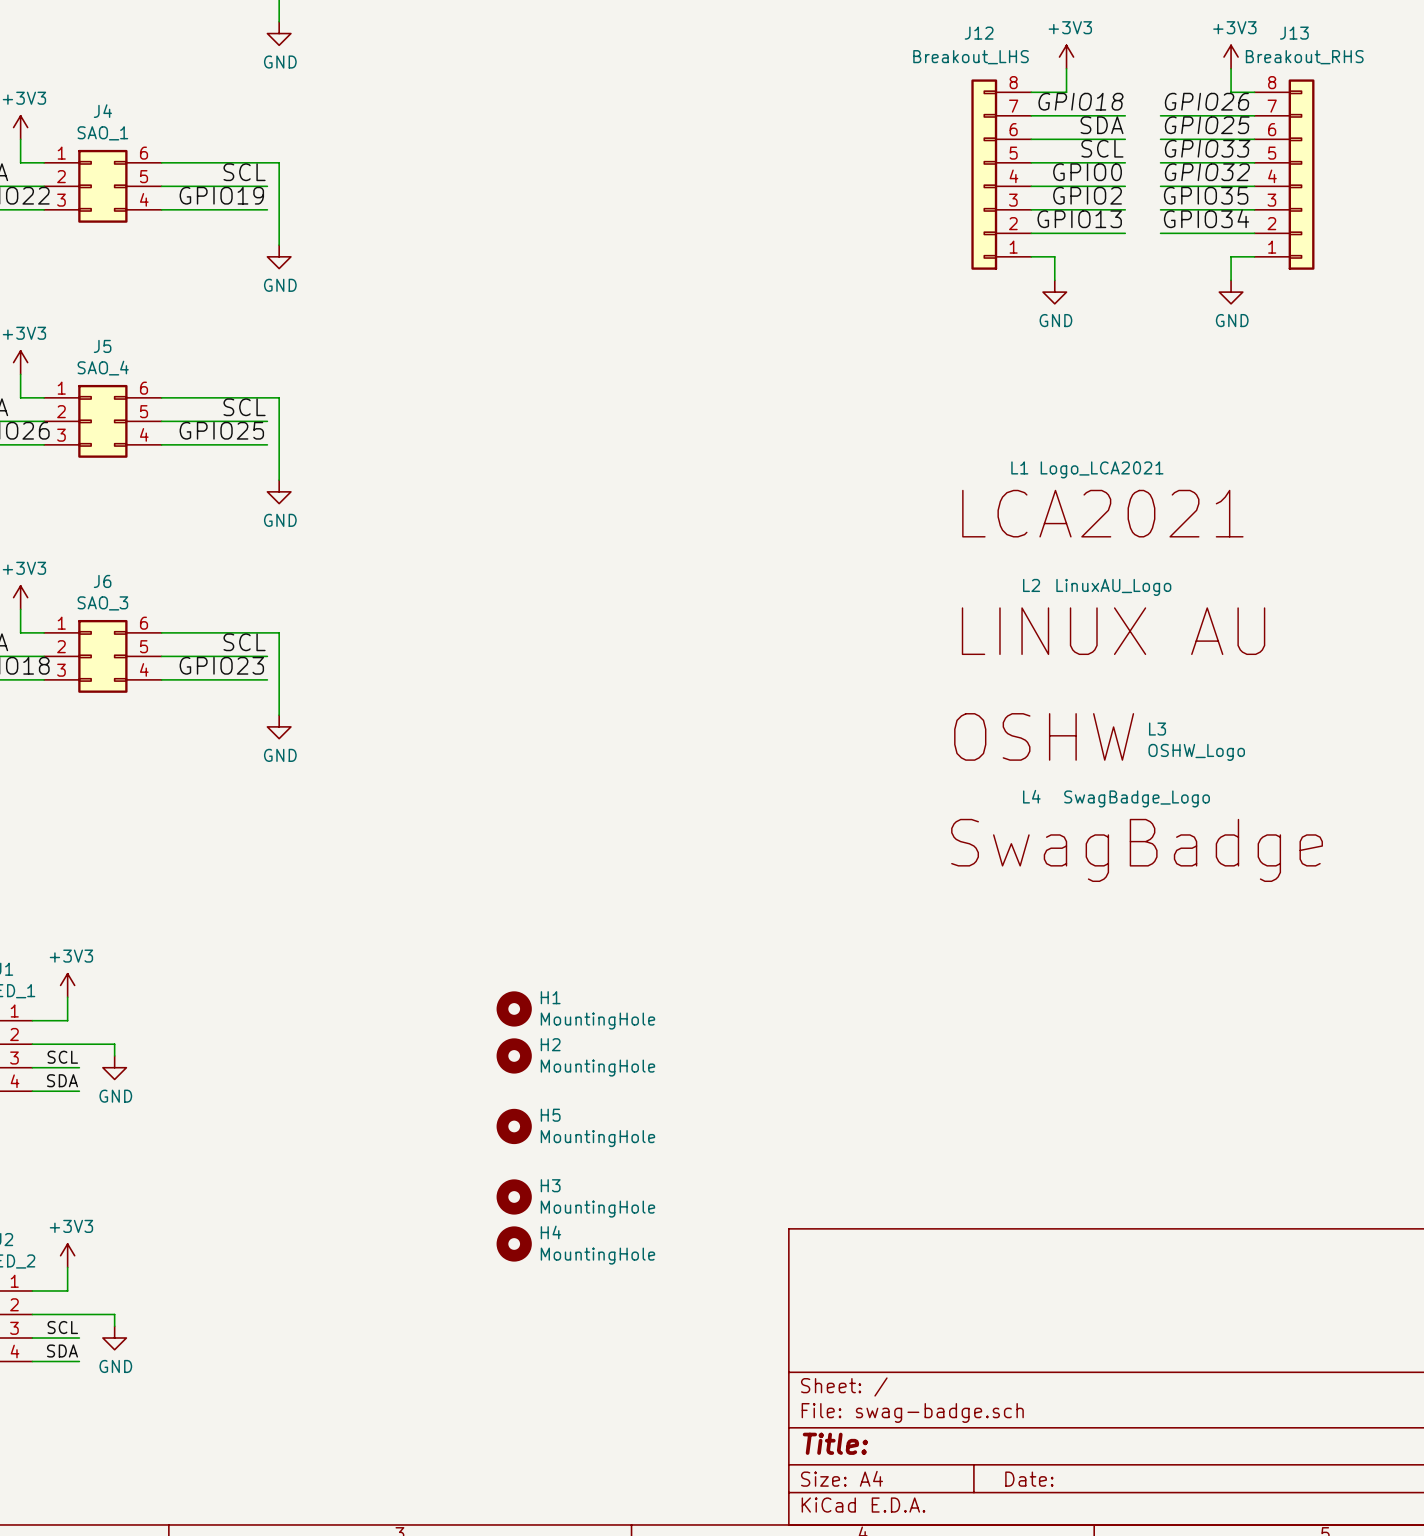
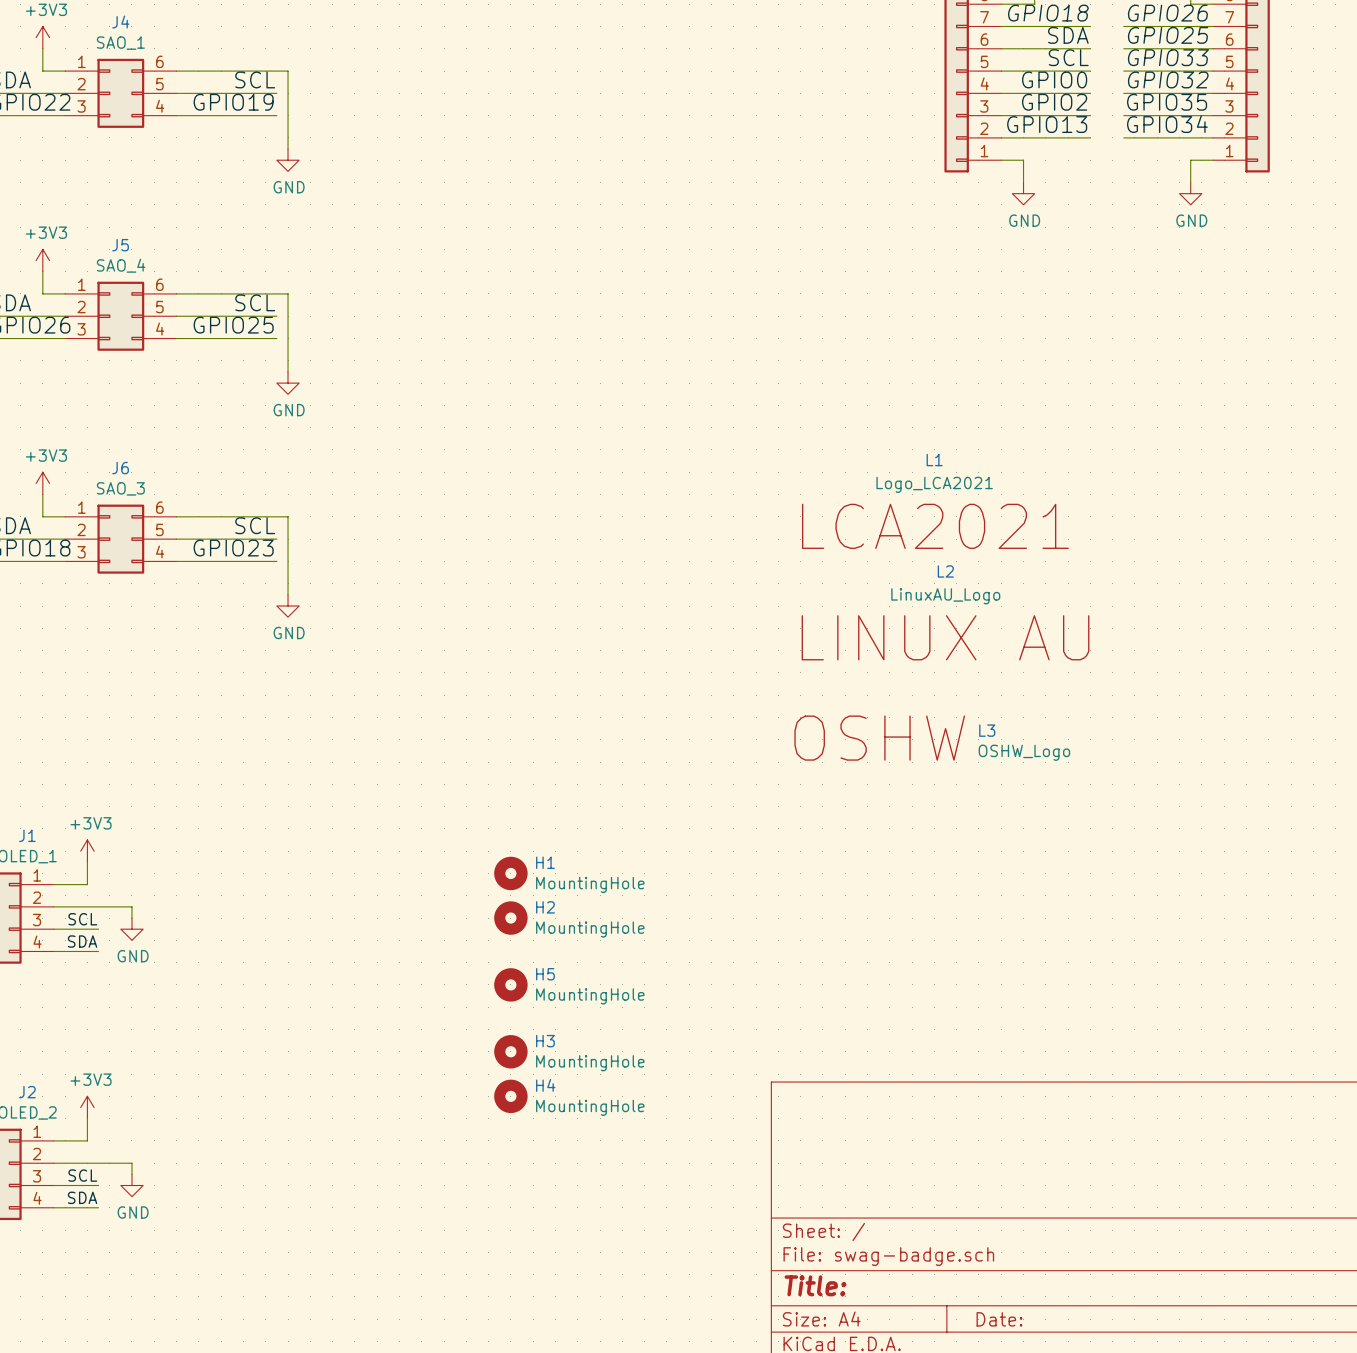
L1 name position: L1 (1019, 467) -> L1 (934, 460)
L1 position: (1102, 499) -> (935, 501)
L2 name position: L2 (1031, 585) -> L2 (945, 571)
L2 position: (1113, 616) -> (945, 612)
L3 position: (1099, 737) -> (932, 738)
L4: SwagBadge_Logo (1137, 835) -> none

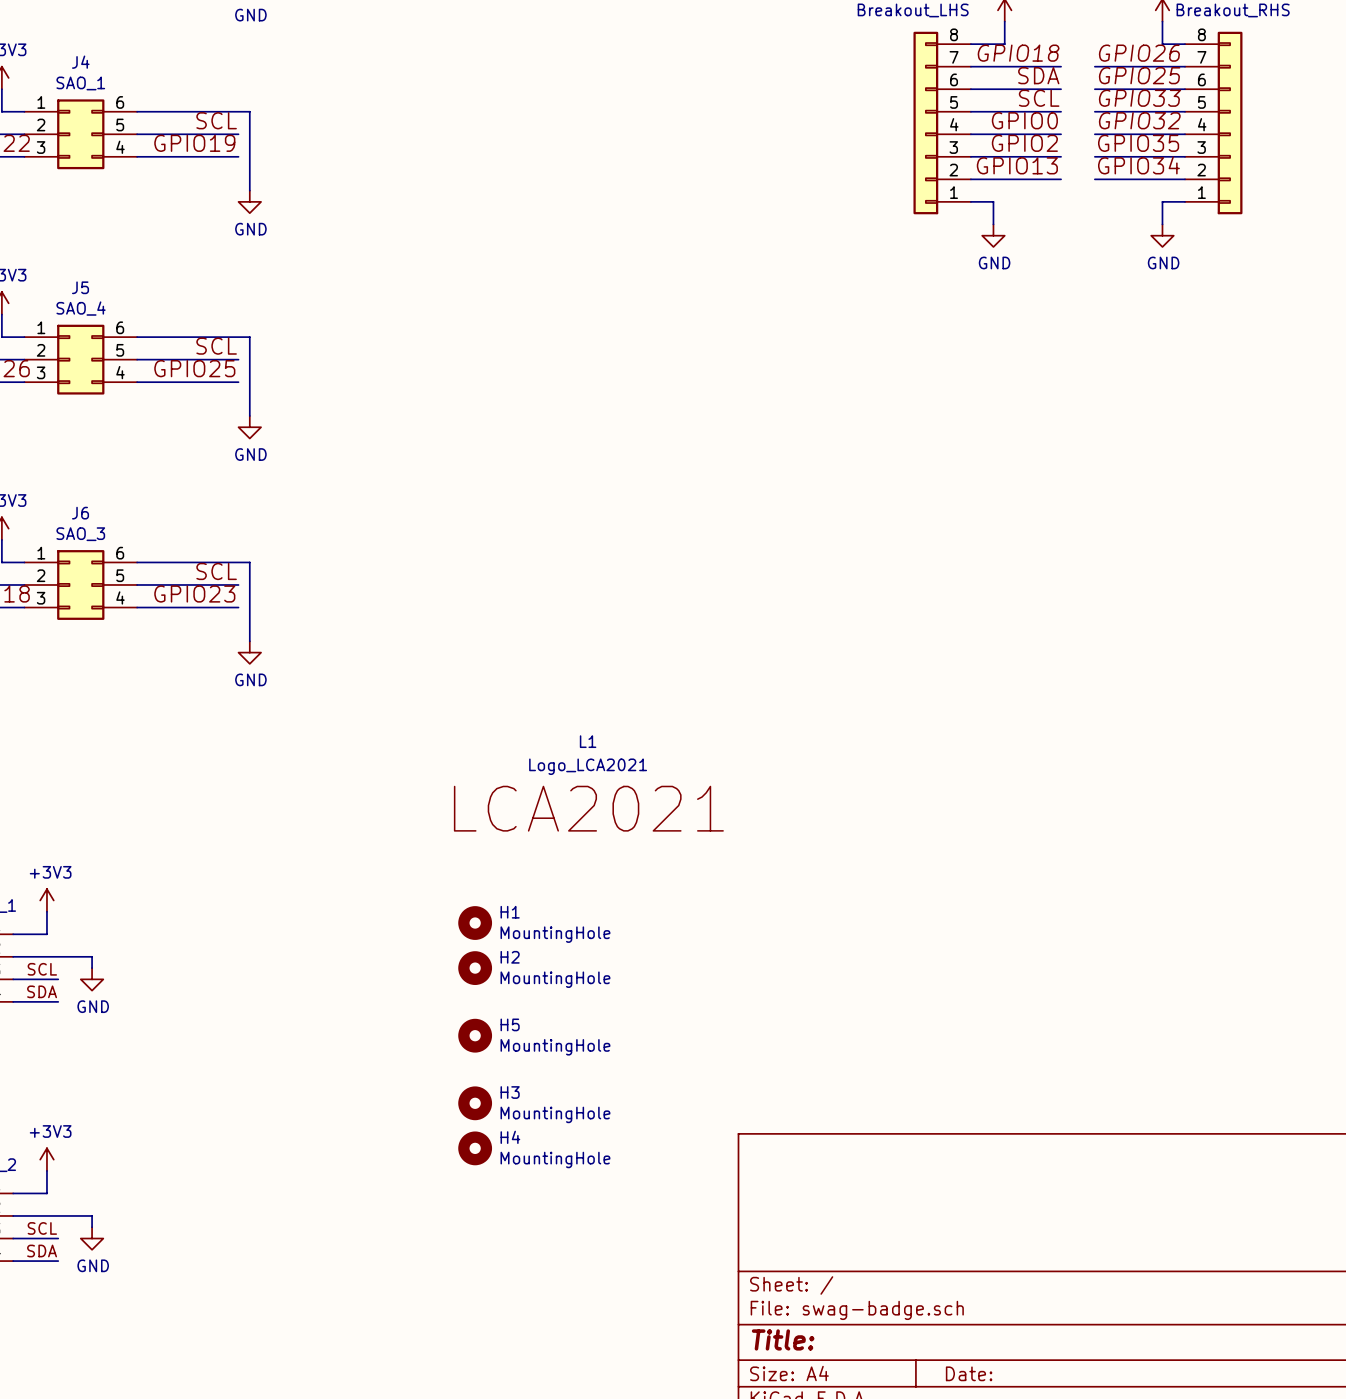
L1 position: (935, 501) -> (588, 783)
L2: LinuxAU_Logo (945, 612) -> none
L3: OSHW_Logo (932, 738) -> none

